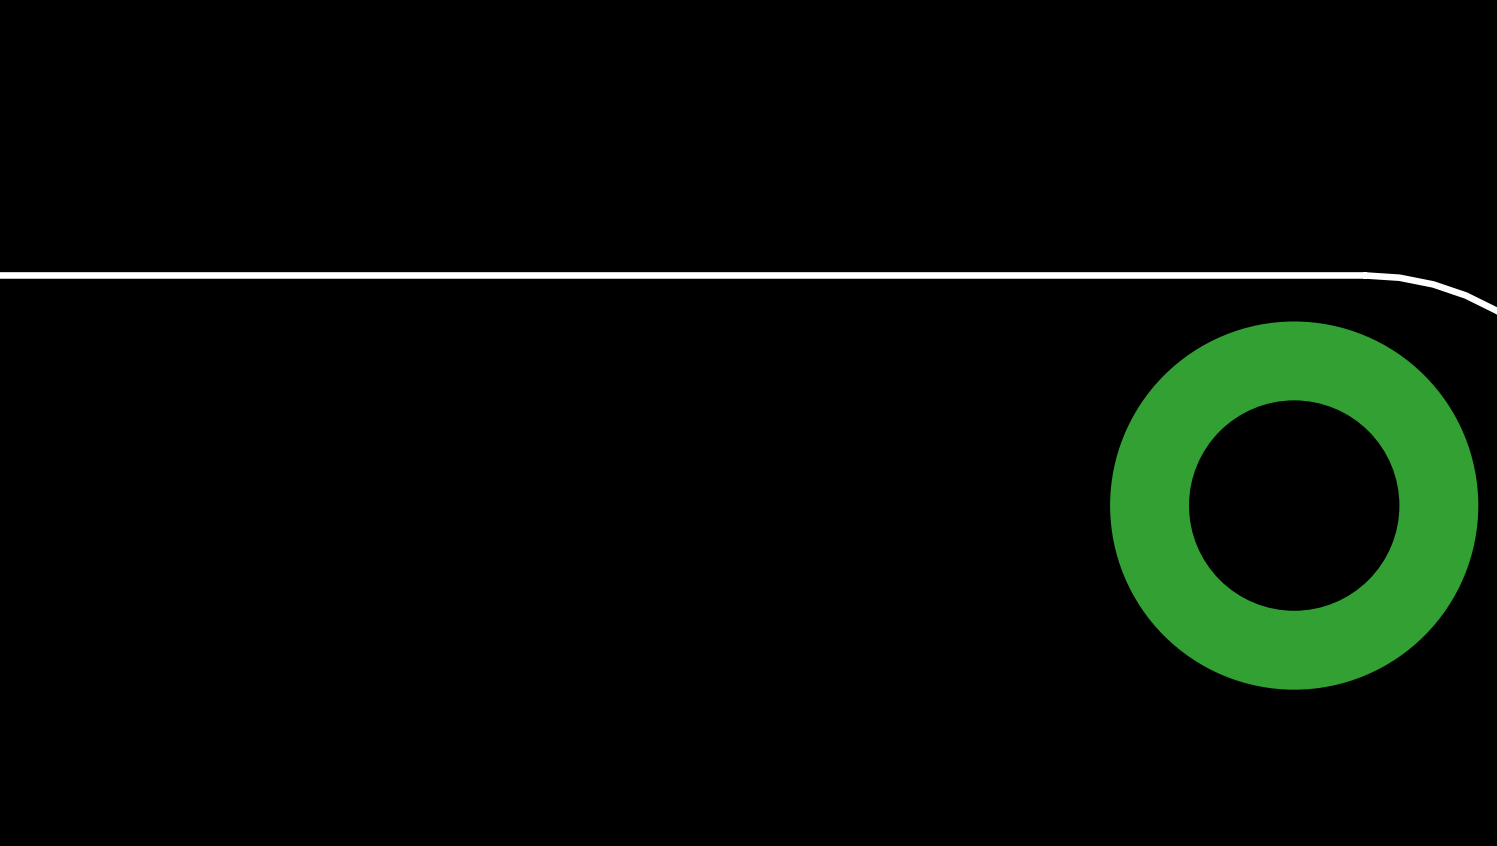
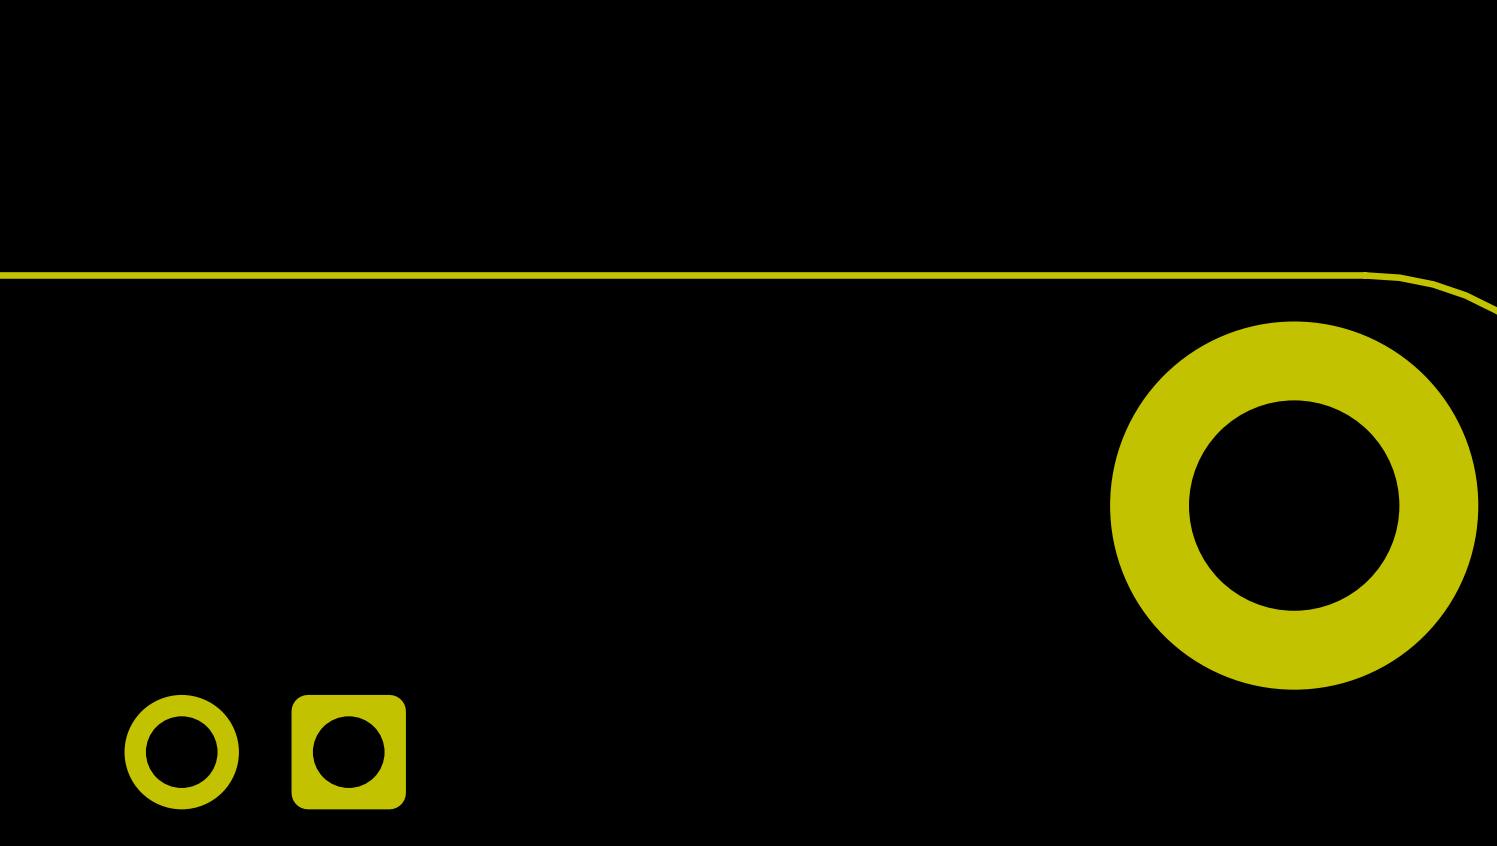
part: none -> (265, 752)

